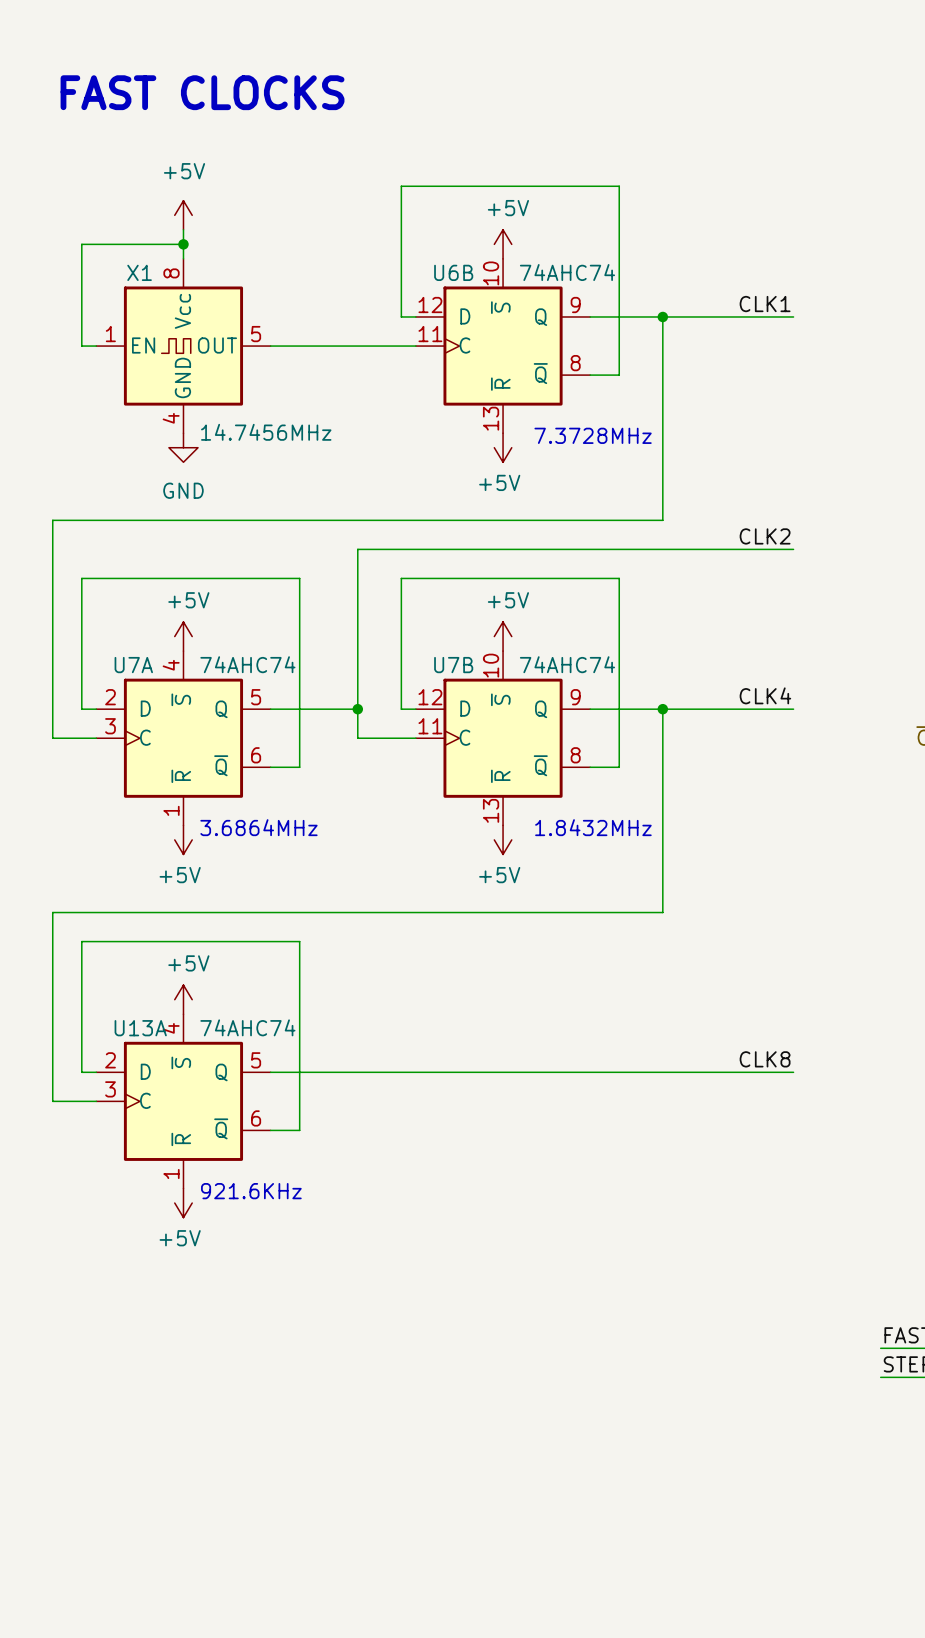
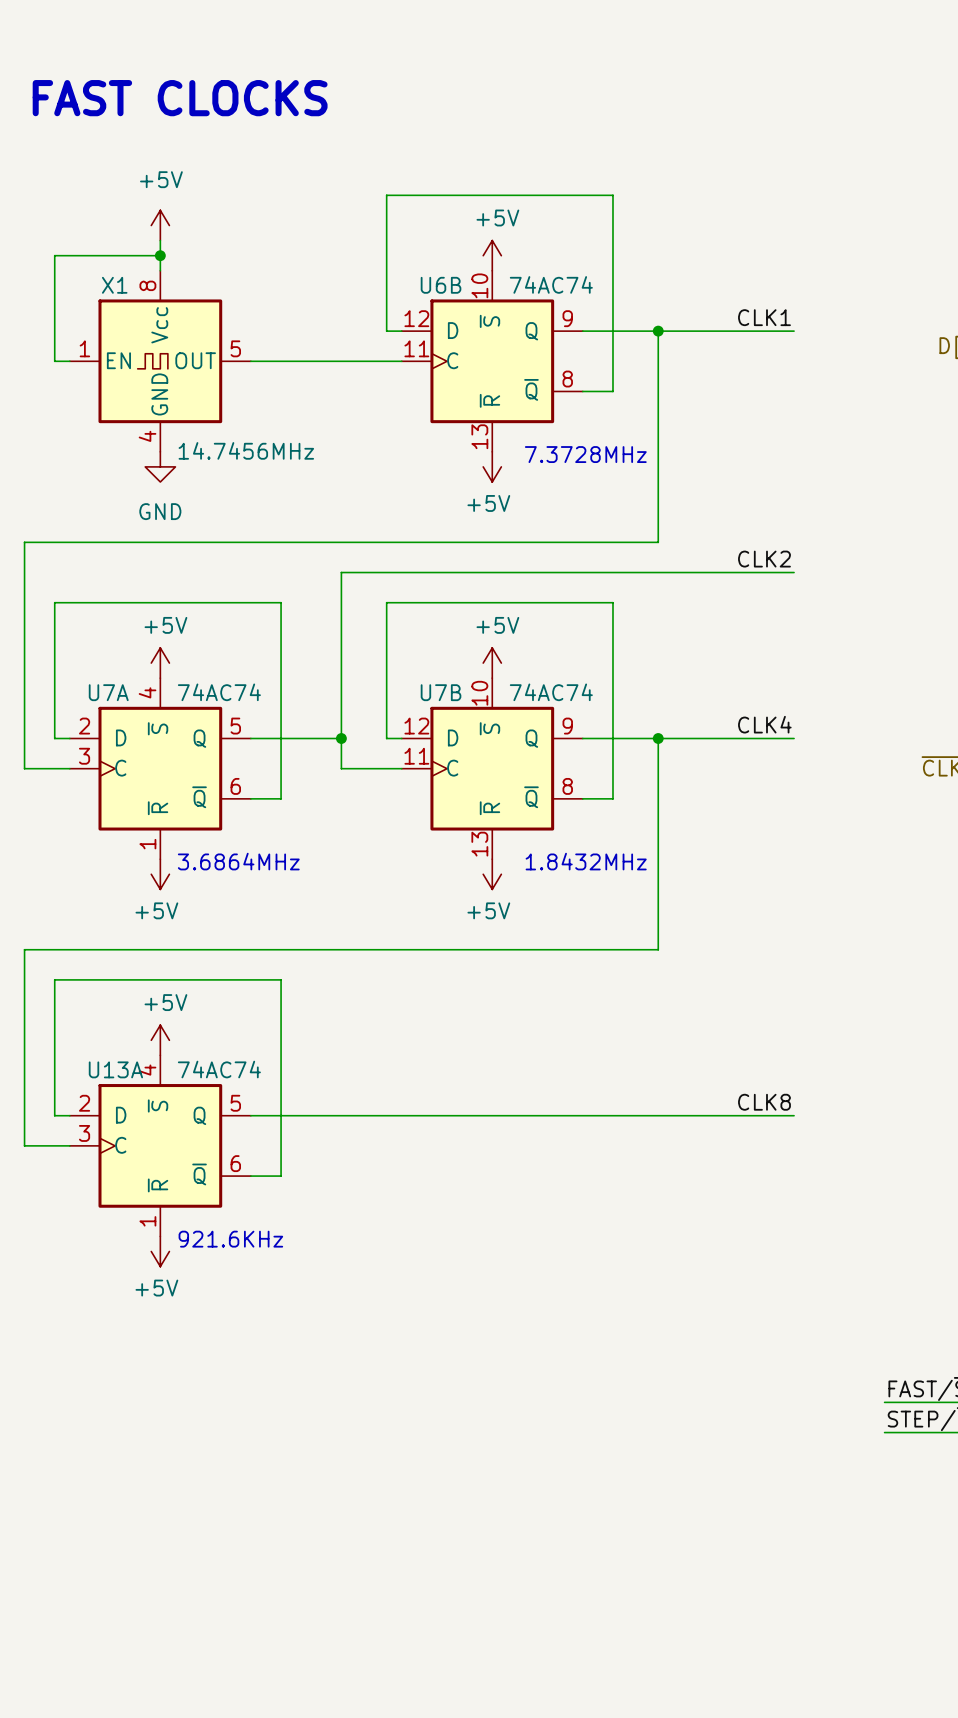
U6B value: 74AHC74 (567, 272) -> 74AC74 (551, 284)
U7A value: 74AHC74 (247, 664) -> 74AC74 (219, 692)
U7B value: 74AHC74 (567, 664) -> 74AC74 (551, 692)
U13A value: 74AHC74 (247, 1027) -> 74AC74 (219, 1069)

